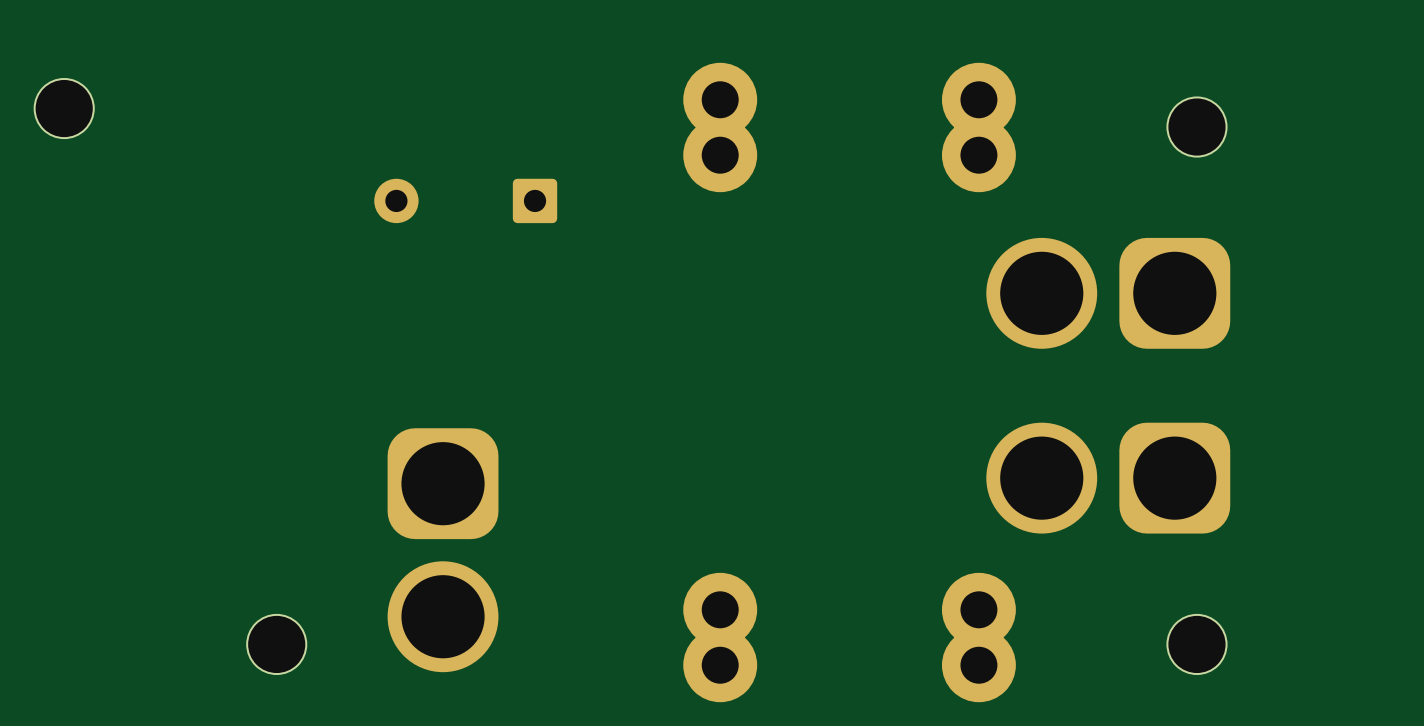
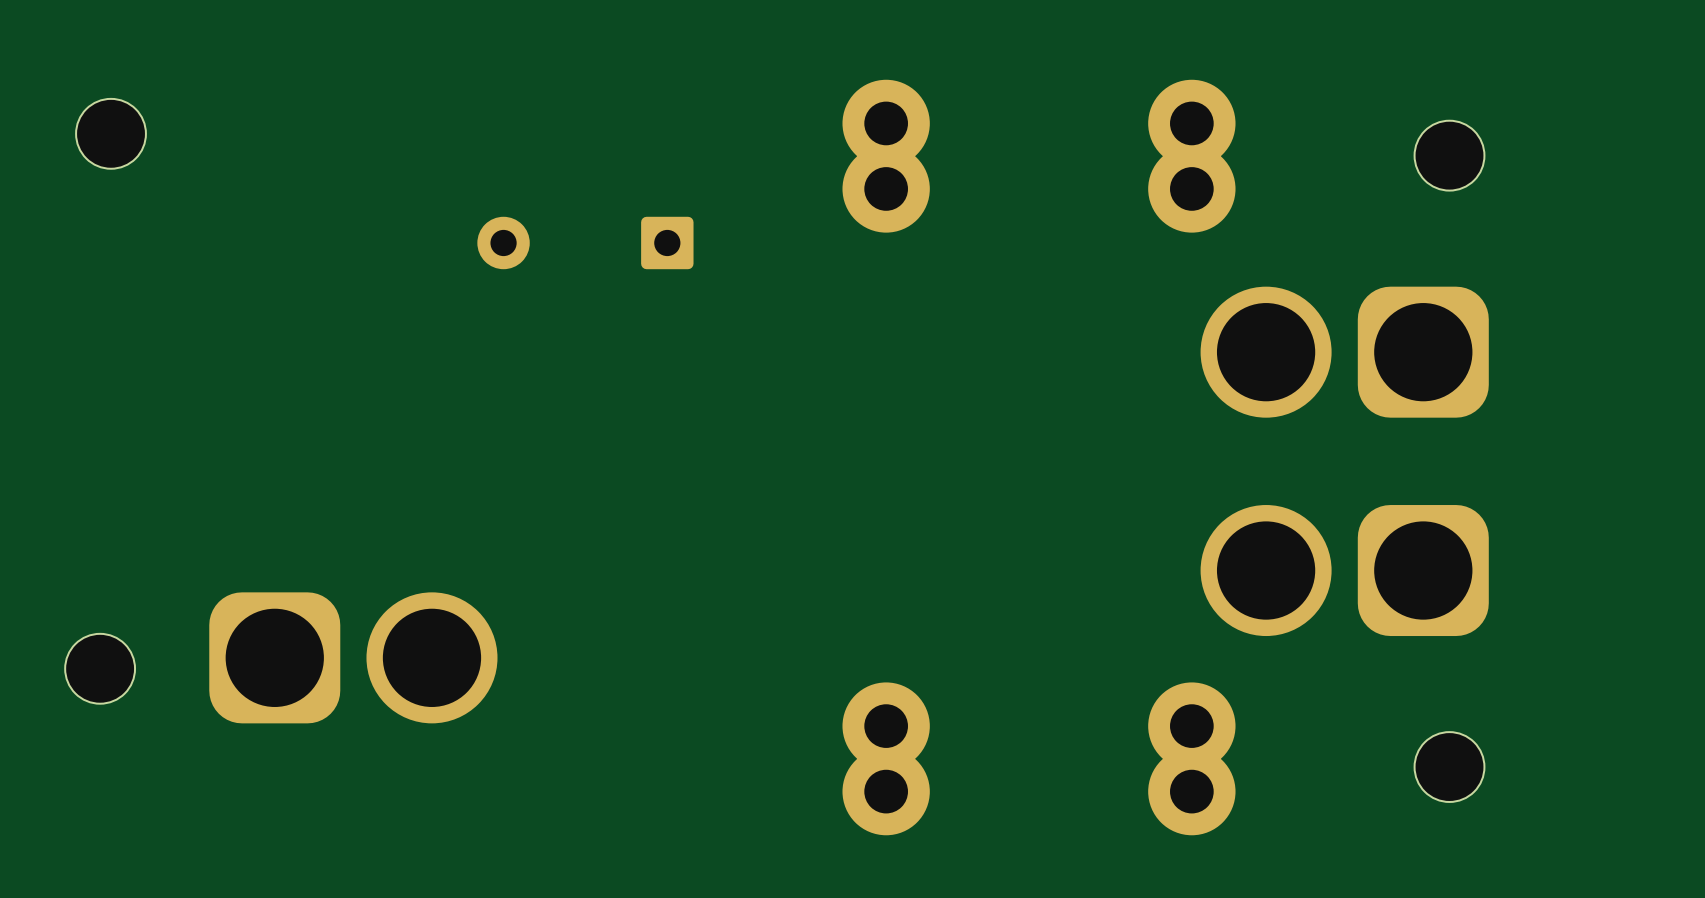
part rotation: 0° (443, 550) -> 90° counterclockwise (353, 657)
part position: (443, 550) -> (353, 657)
part position: (276, 644) -> (100, 668)

